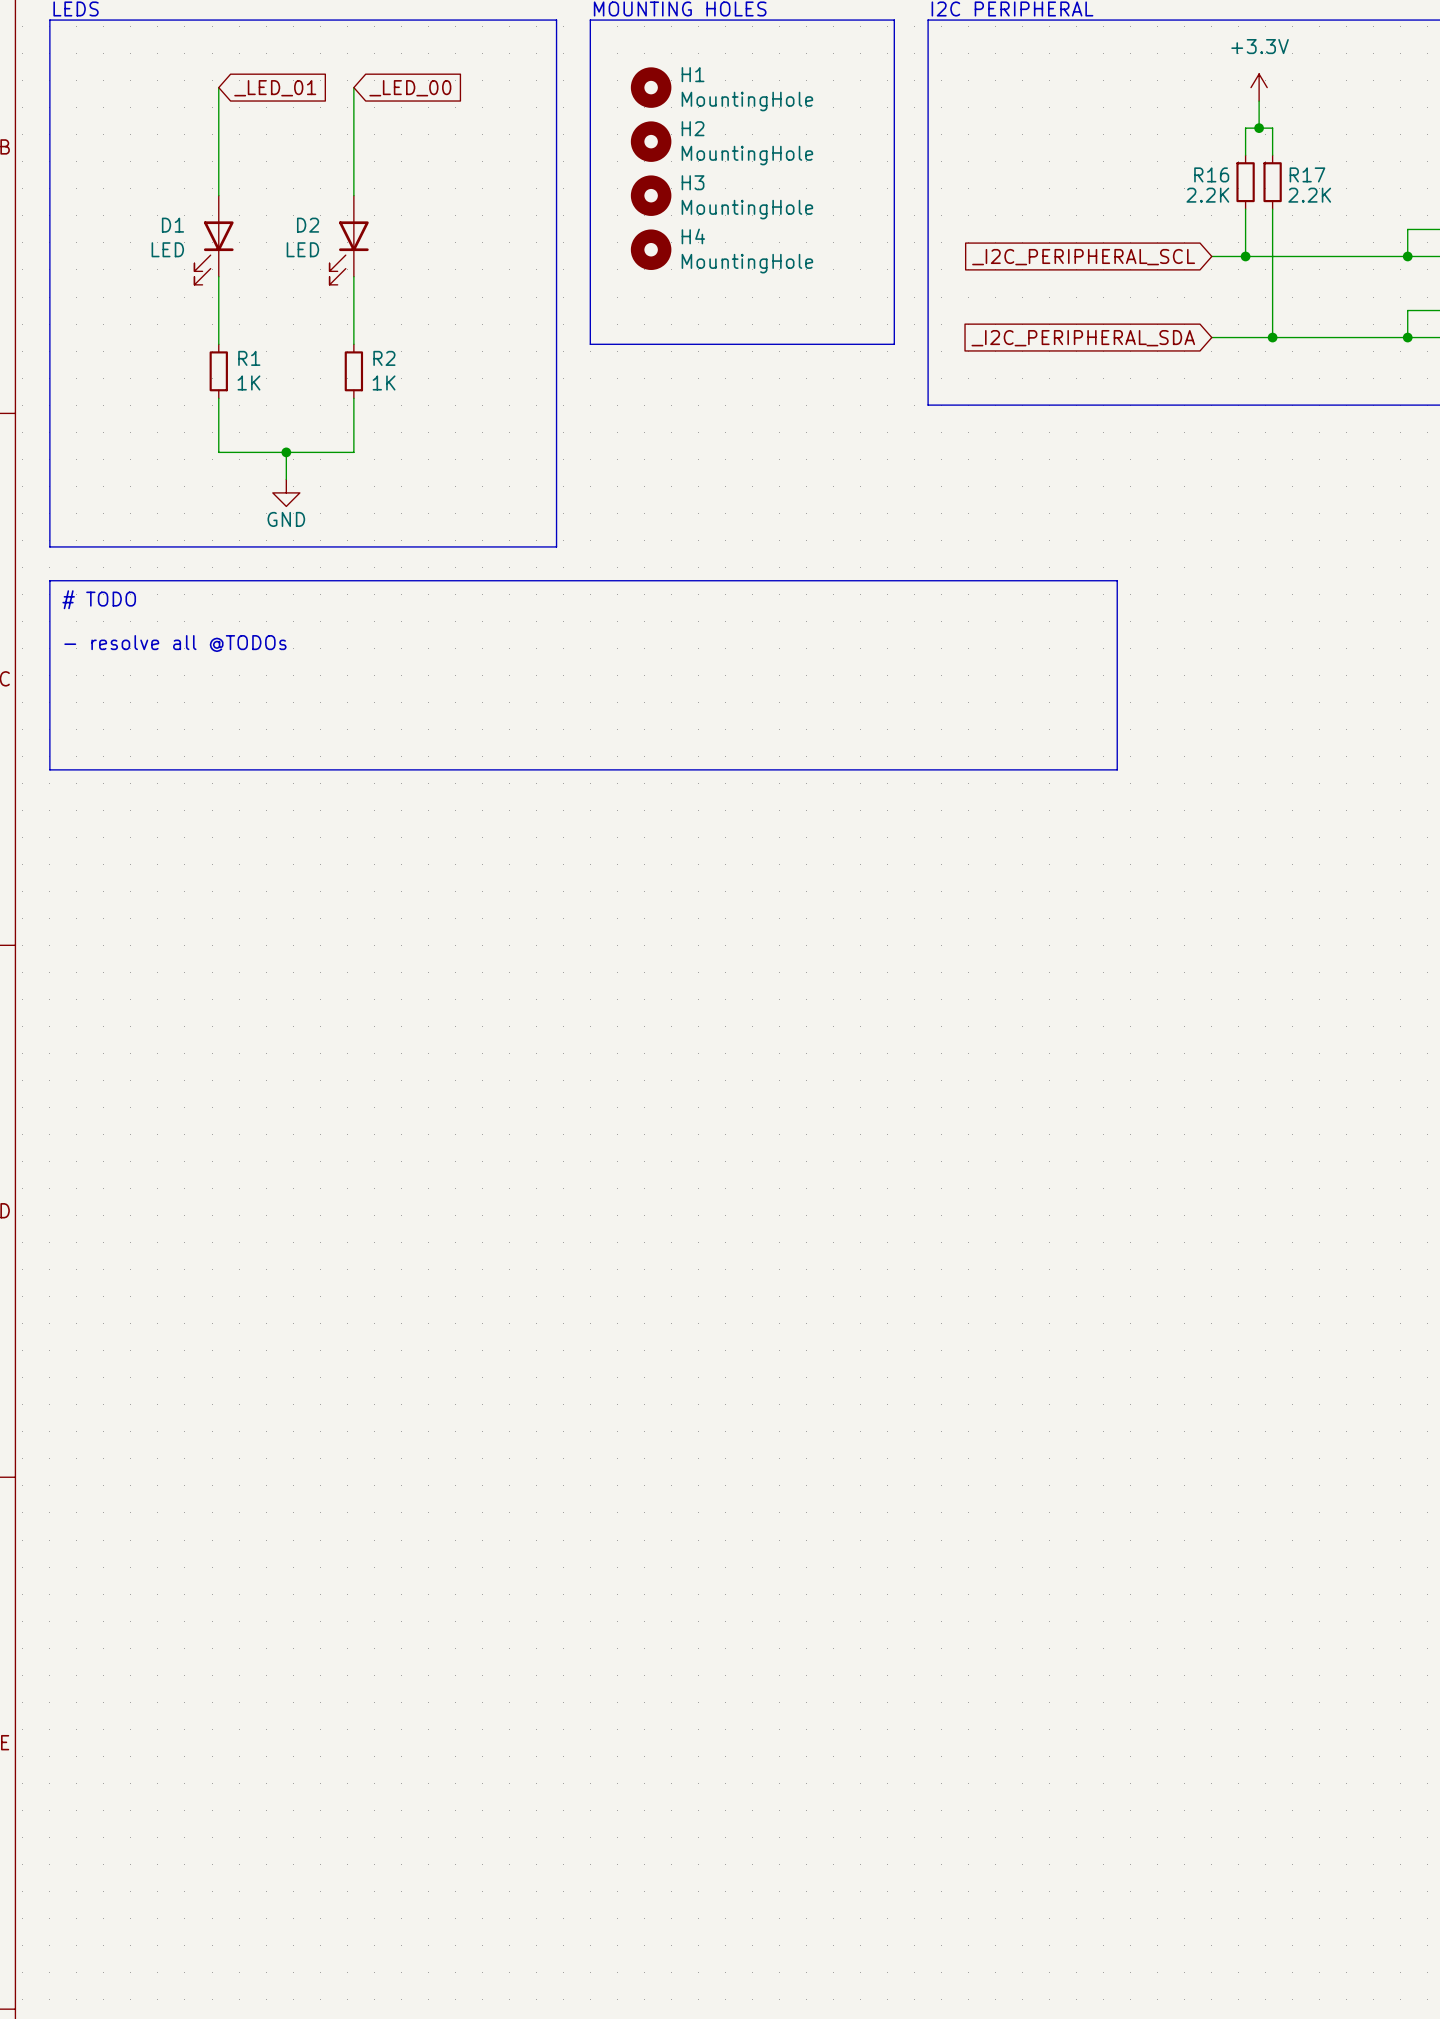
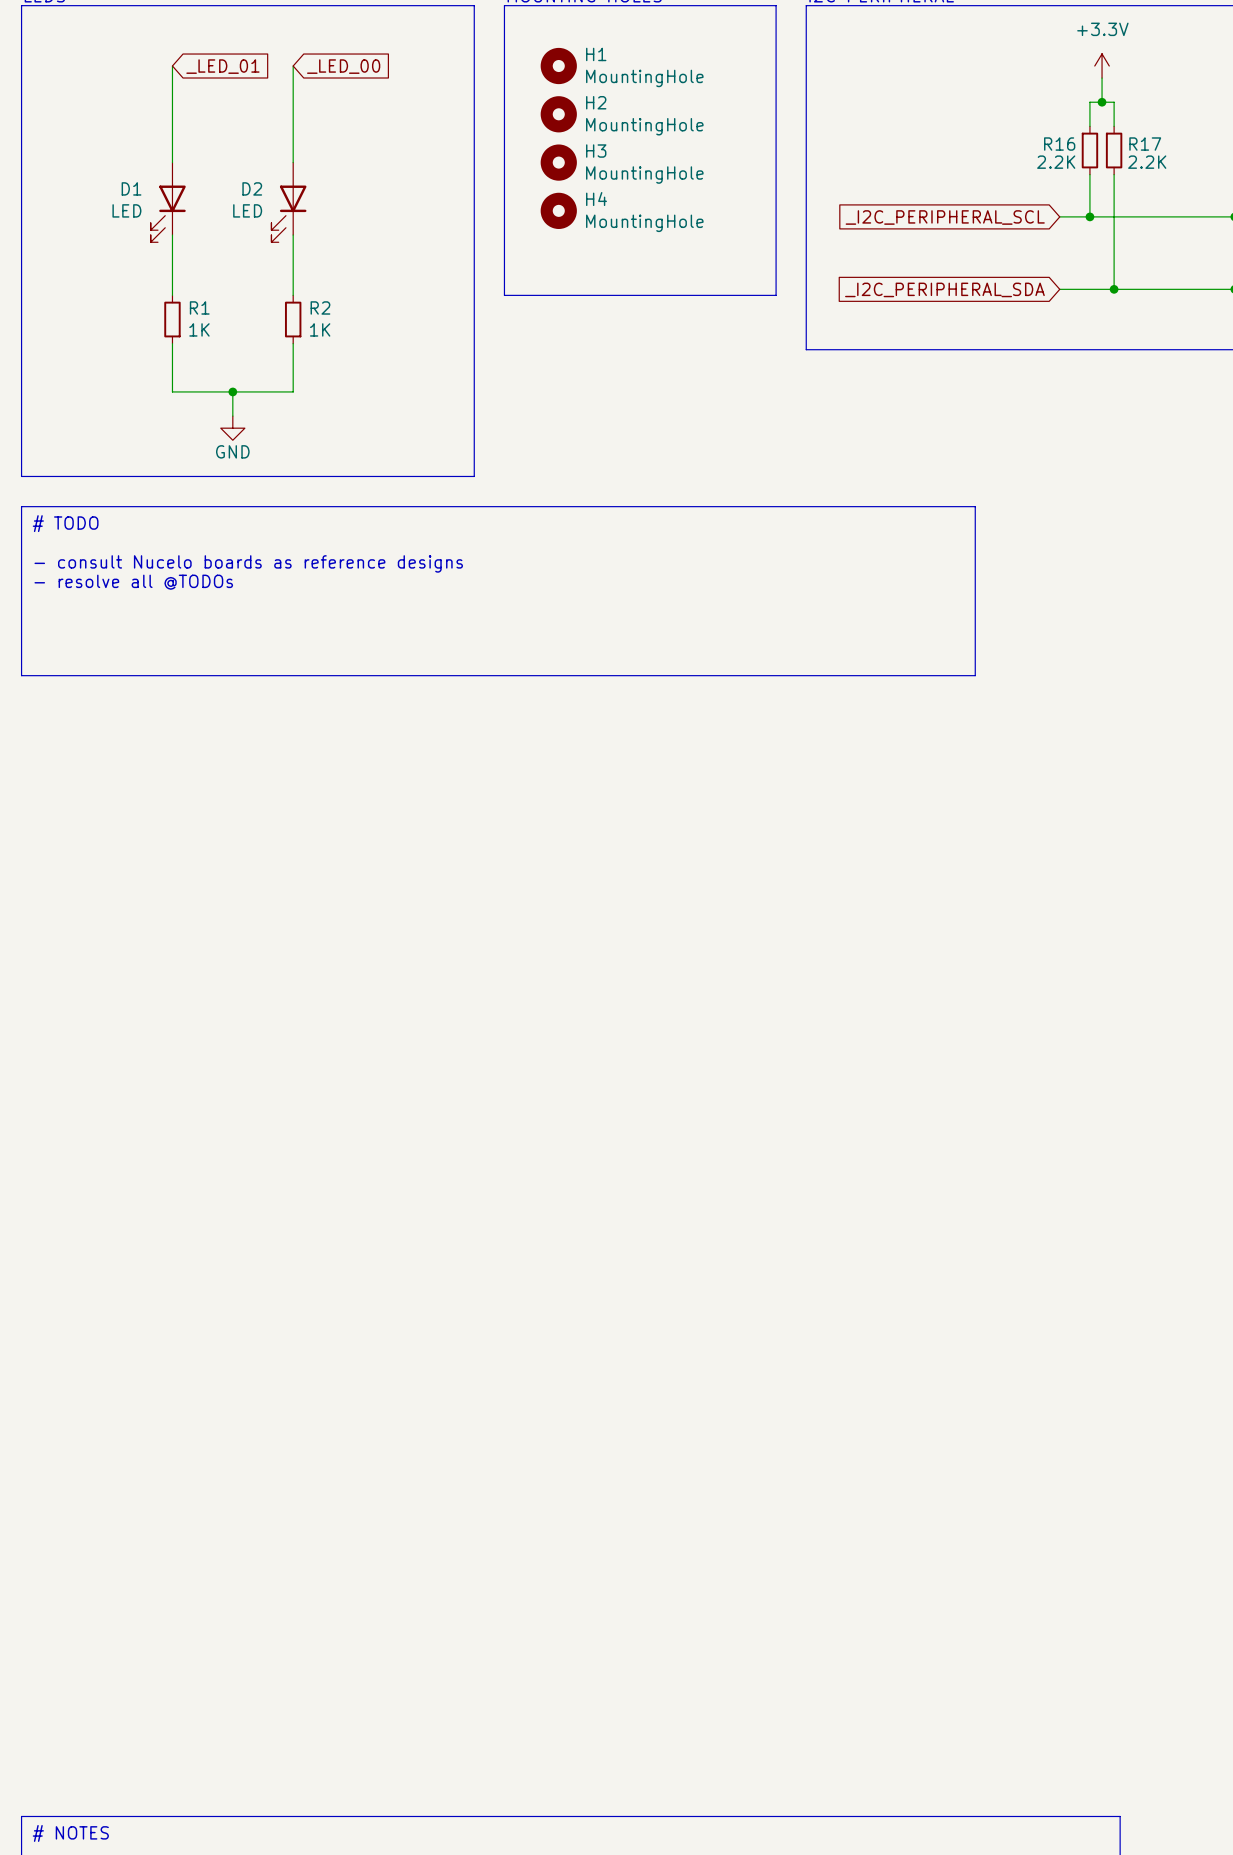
text: - resolve all @TODOs (175, 643) -> - consult Nucelo boards as reference designs (248, 563)
text: none -> - resolve all @TODOs (133, 582)

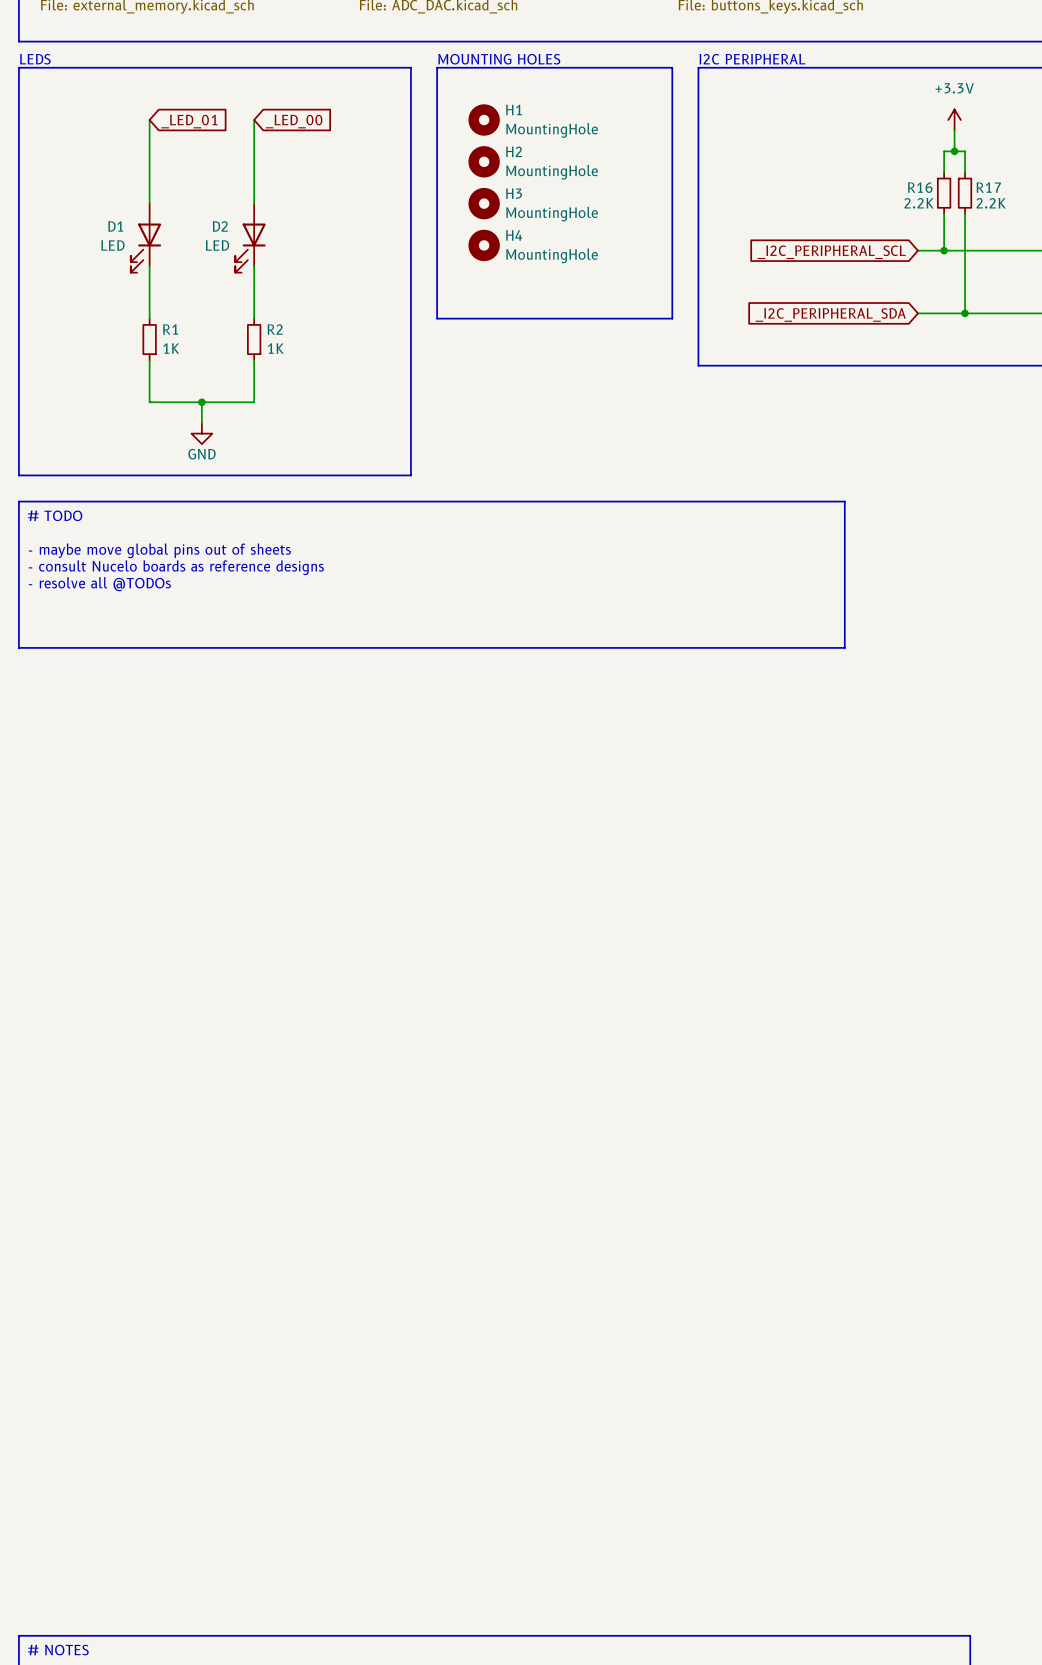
text: - consult Nucelo boards as reference designs (248, 563) -> - maybe move global pins out of sheets (159, 550)
text: - resolve all @TODOs (133, 582) -> - consult Nucelo boards as reference designs (176, 567)
text: none -> - resolve all @TODOs (99, 584)

